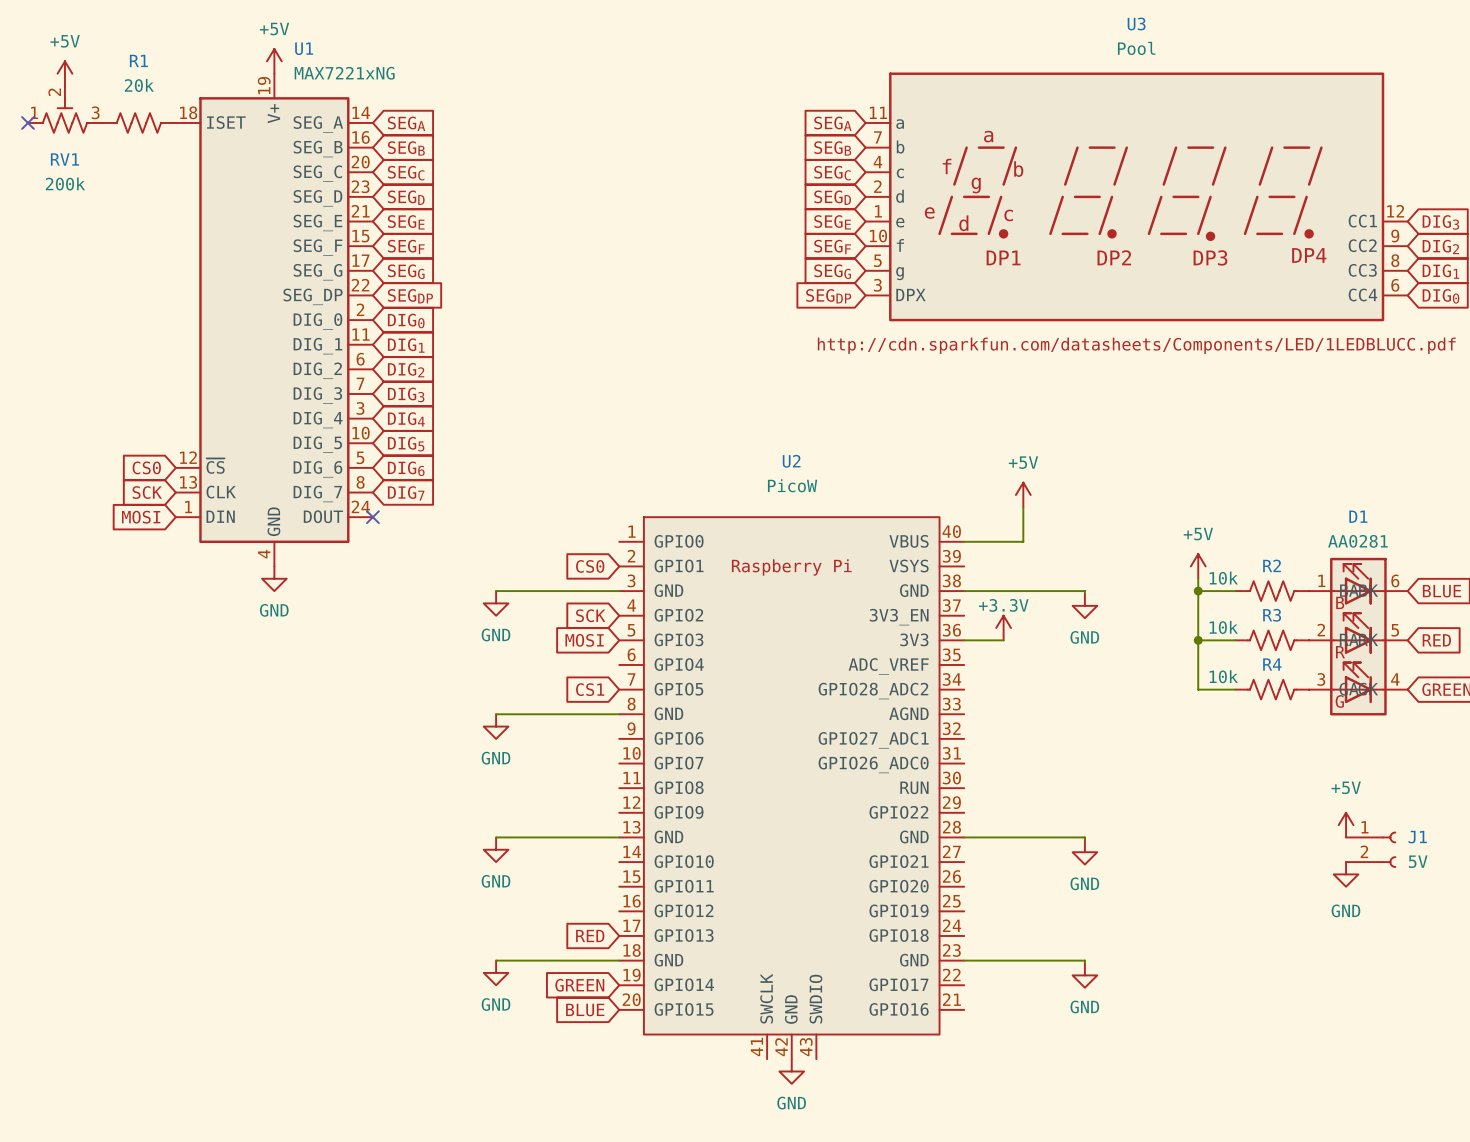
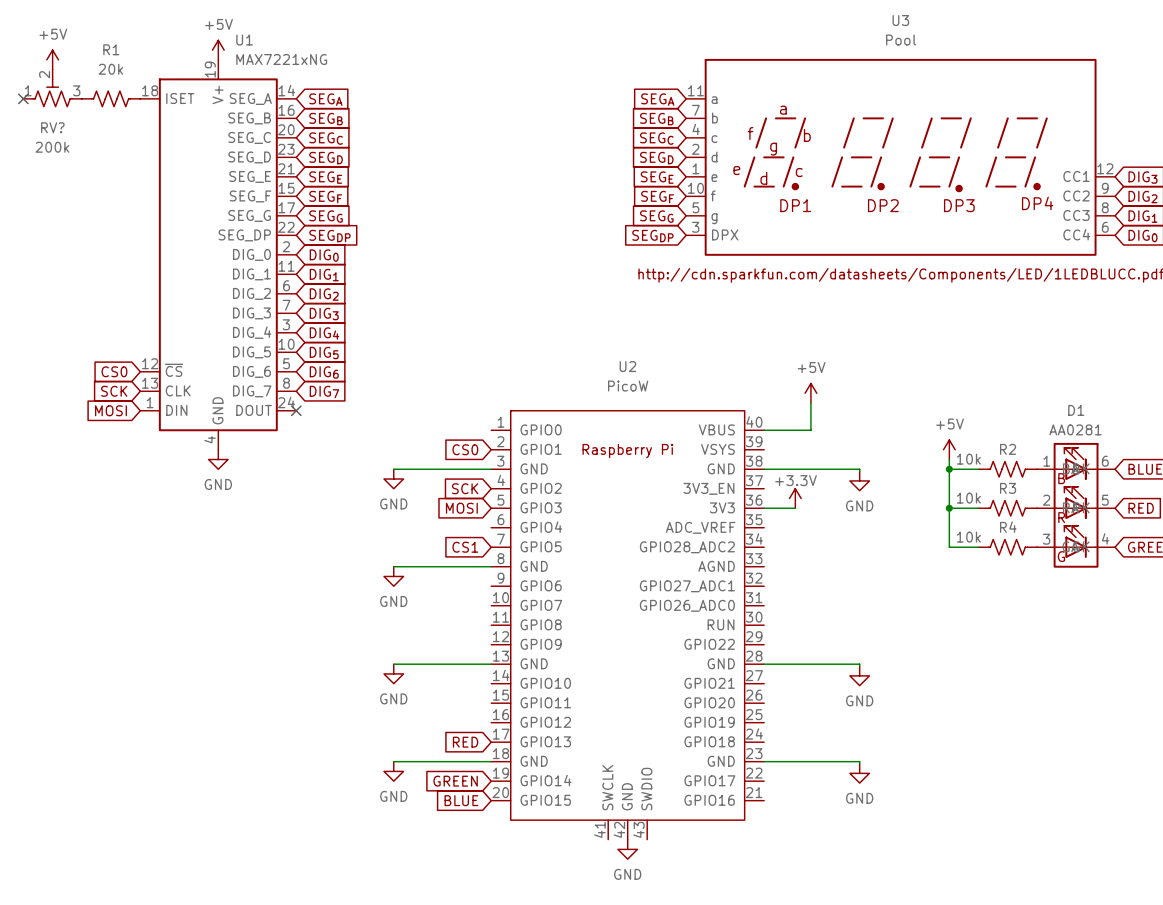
RV1 name: RV1 (64, 159) -> RV? (52, 127)
power symbol: +5V (1346, 825) -> none
J1: 5V (1371, 849) -> none
power symbol: GND (1346, 874) -> none

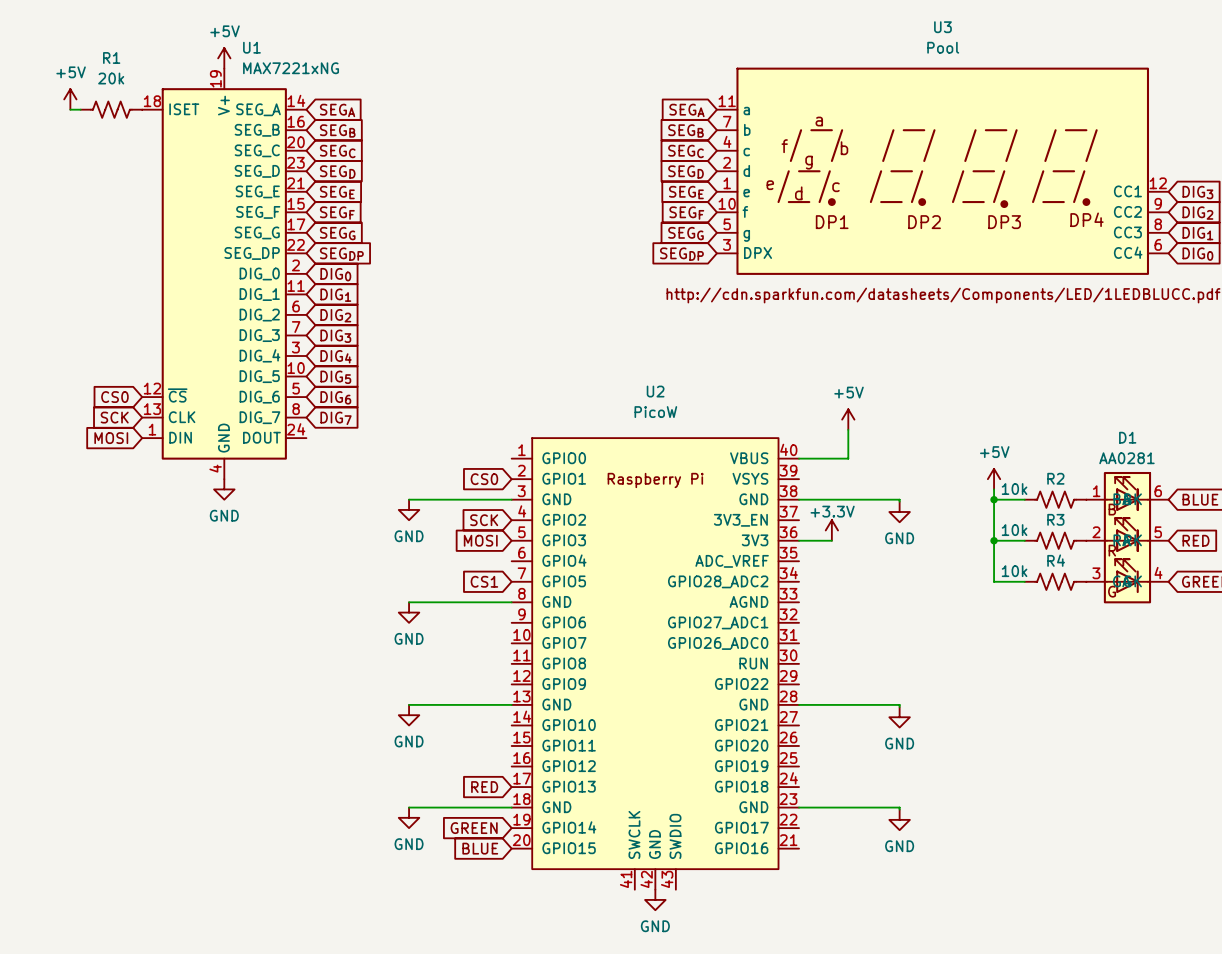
power symbol position: +5V (52, 59) -> +5V (70, 99)
RV?: 200k (52, 88) -> none
no-connect mark: (23, 98) -> none
no-connect mark: (296, 410) -> none

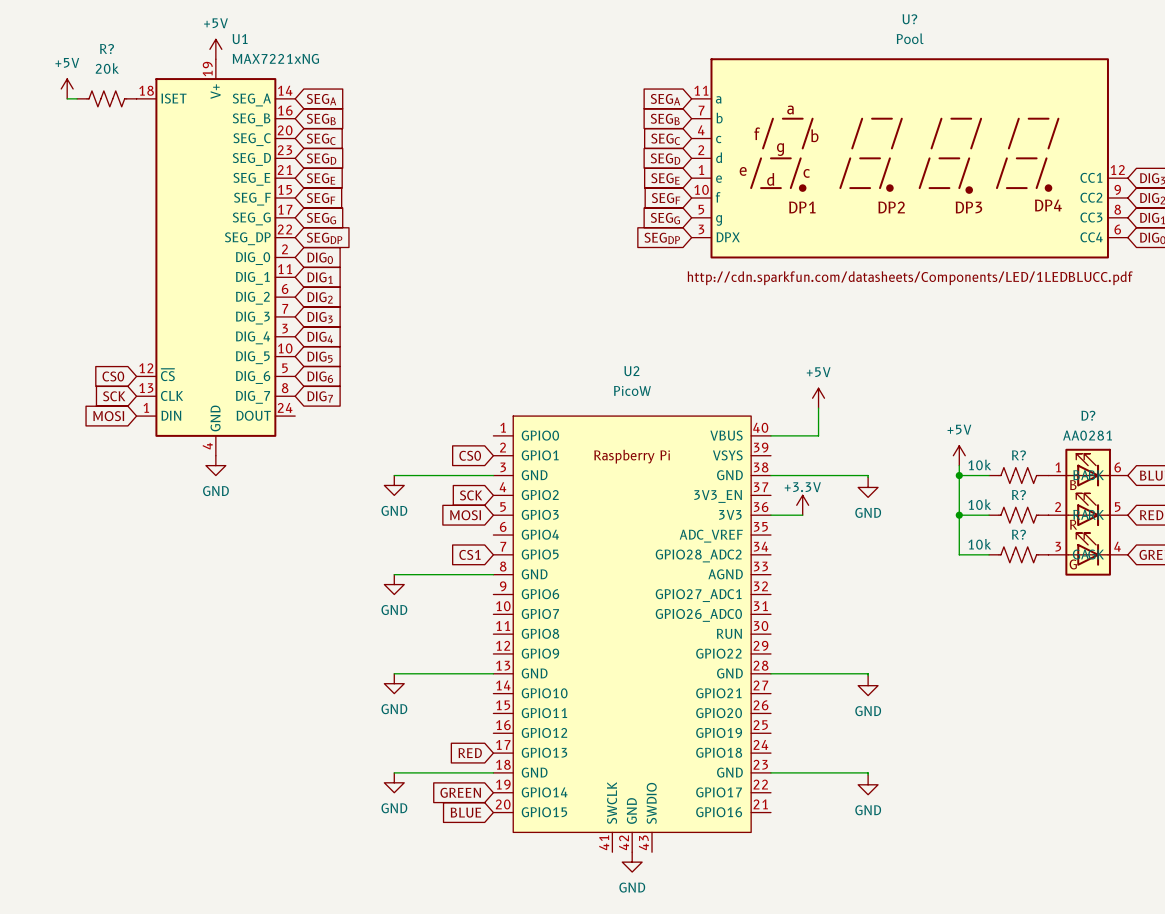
U3 name: U3 (942, 27) -> U? (909, 19)
R1 name: R1 (111, 57) -> R? (107, 49)
D1 name: D1 (1127, 437) -> D? (1088, 415)
R2 name: R2 (1055, 478) -> R? (1018, 455)
R3 name: R3 (1055, 519) -> R? (1018, 495)
R4 name: R4 (1056, 560) -> R? (1018, 534)

